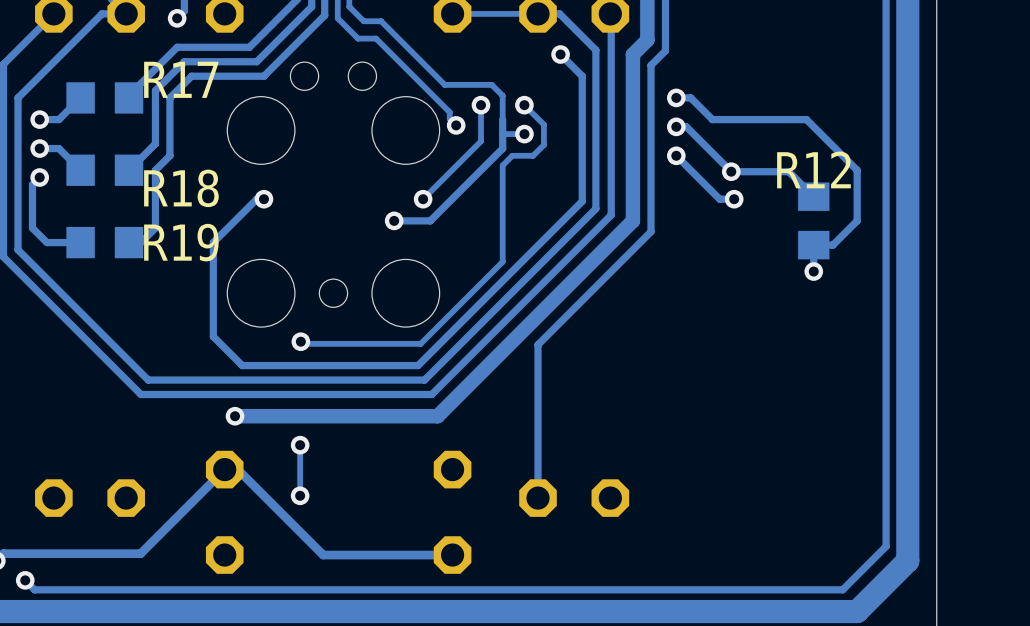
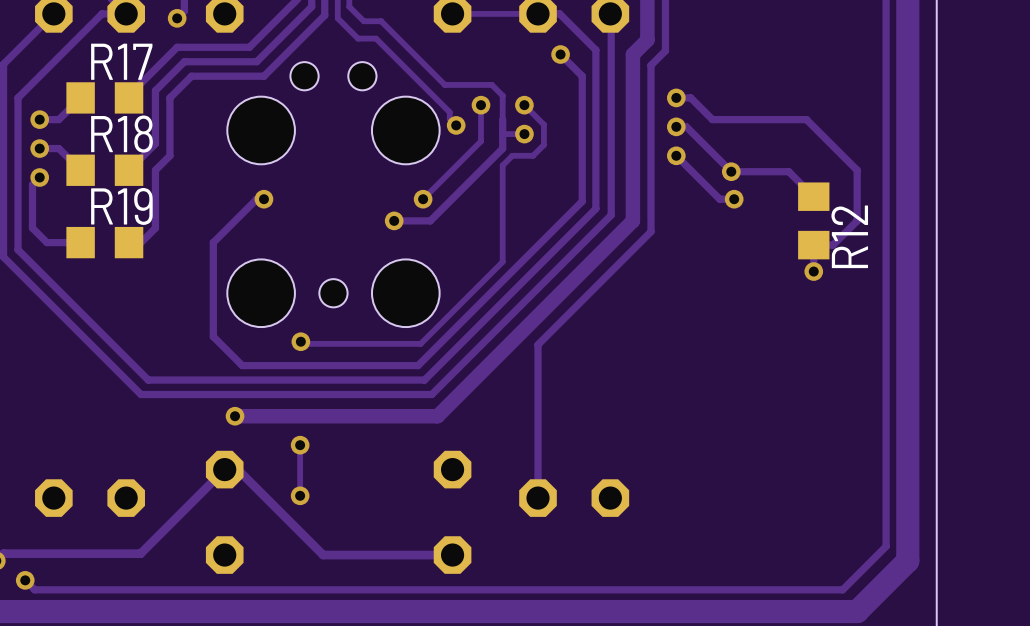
R17 name position: R17 (181, 79) -> R17 (121, 61)
R12 name rotation: 0° (813, 169) -> 90° counterclockwise (849, 236)
R18 name position: R18 (181, 188) -> R18 (121, 134)
R19 name position: R19 (181, 242) -> R19 (121, 206)

